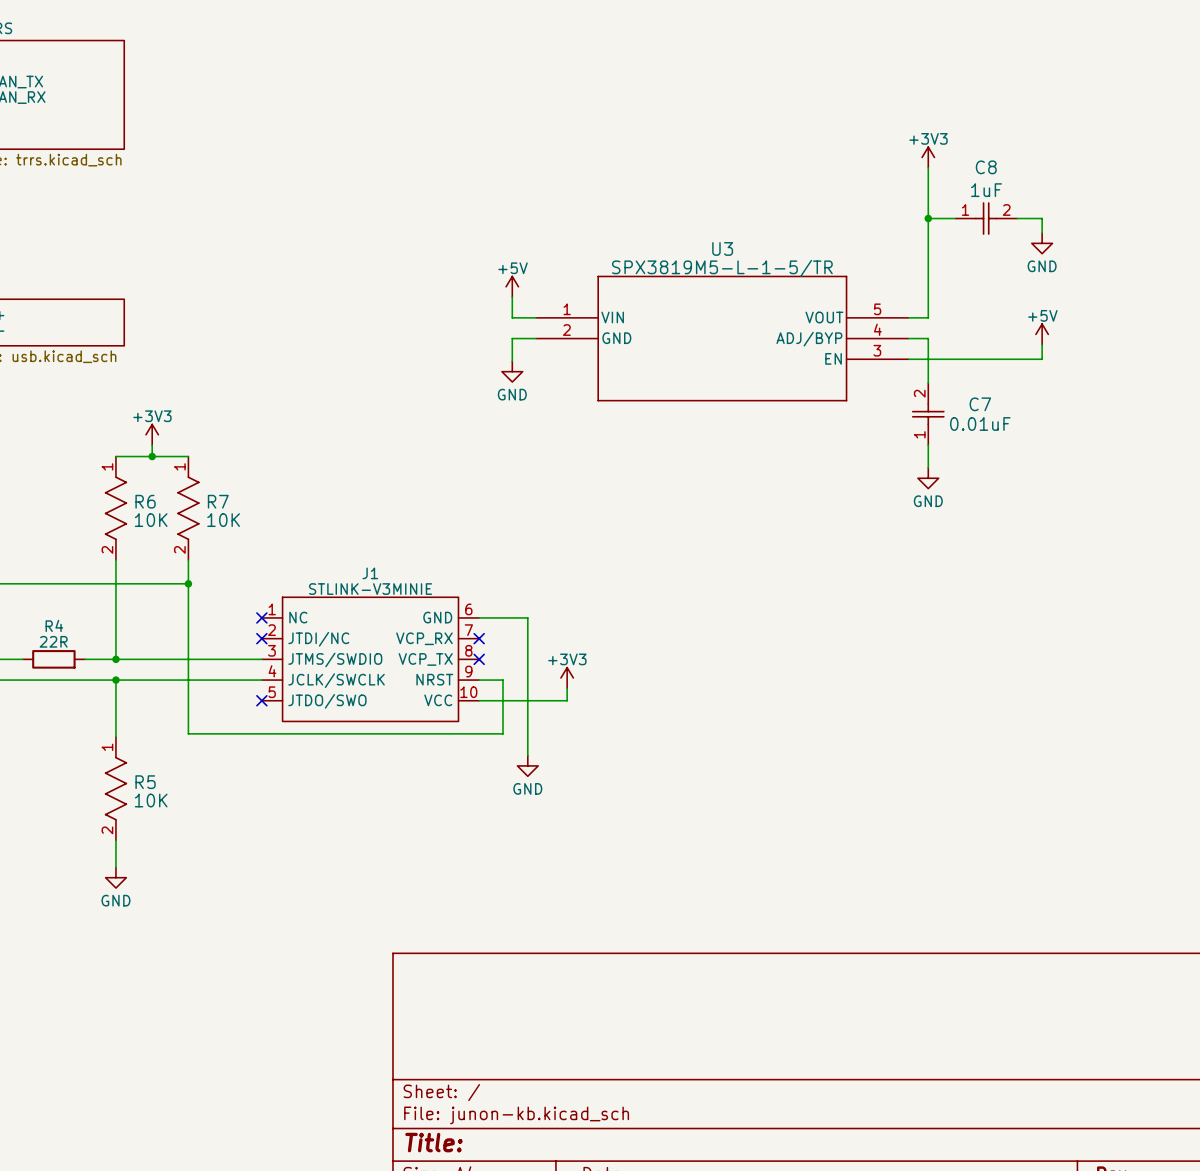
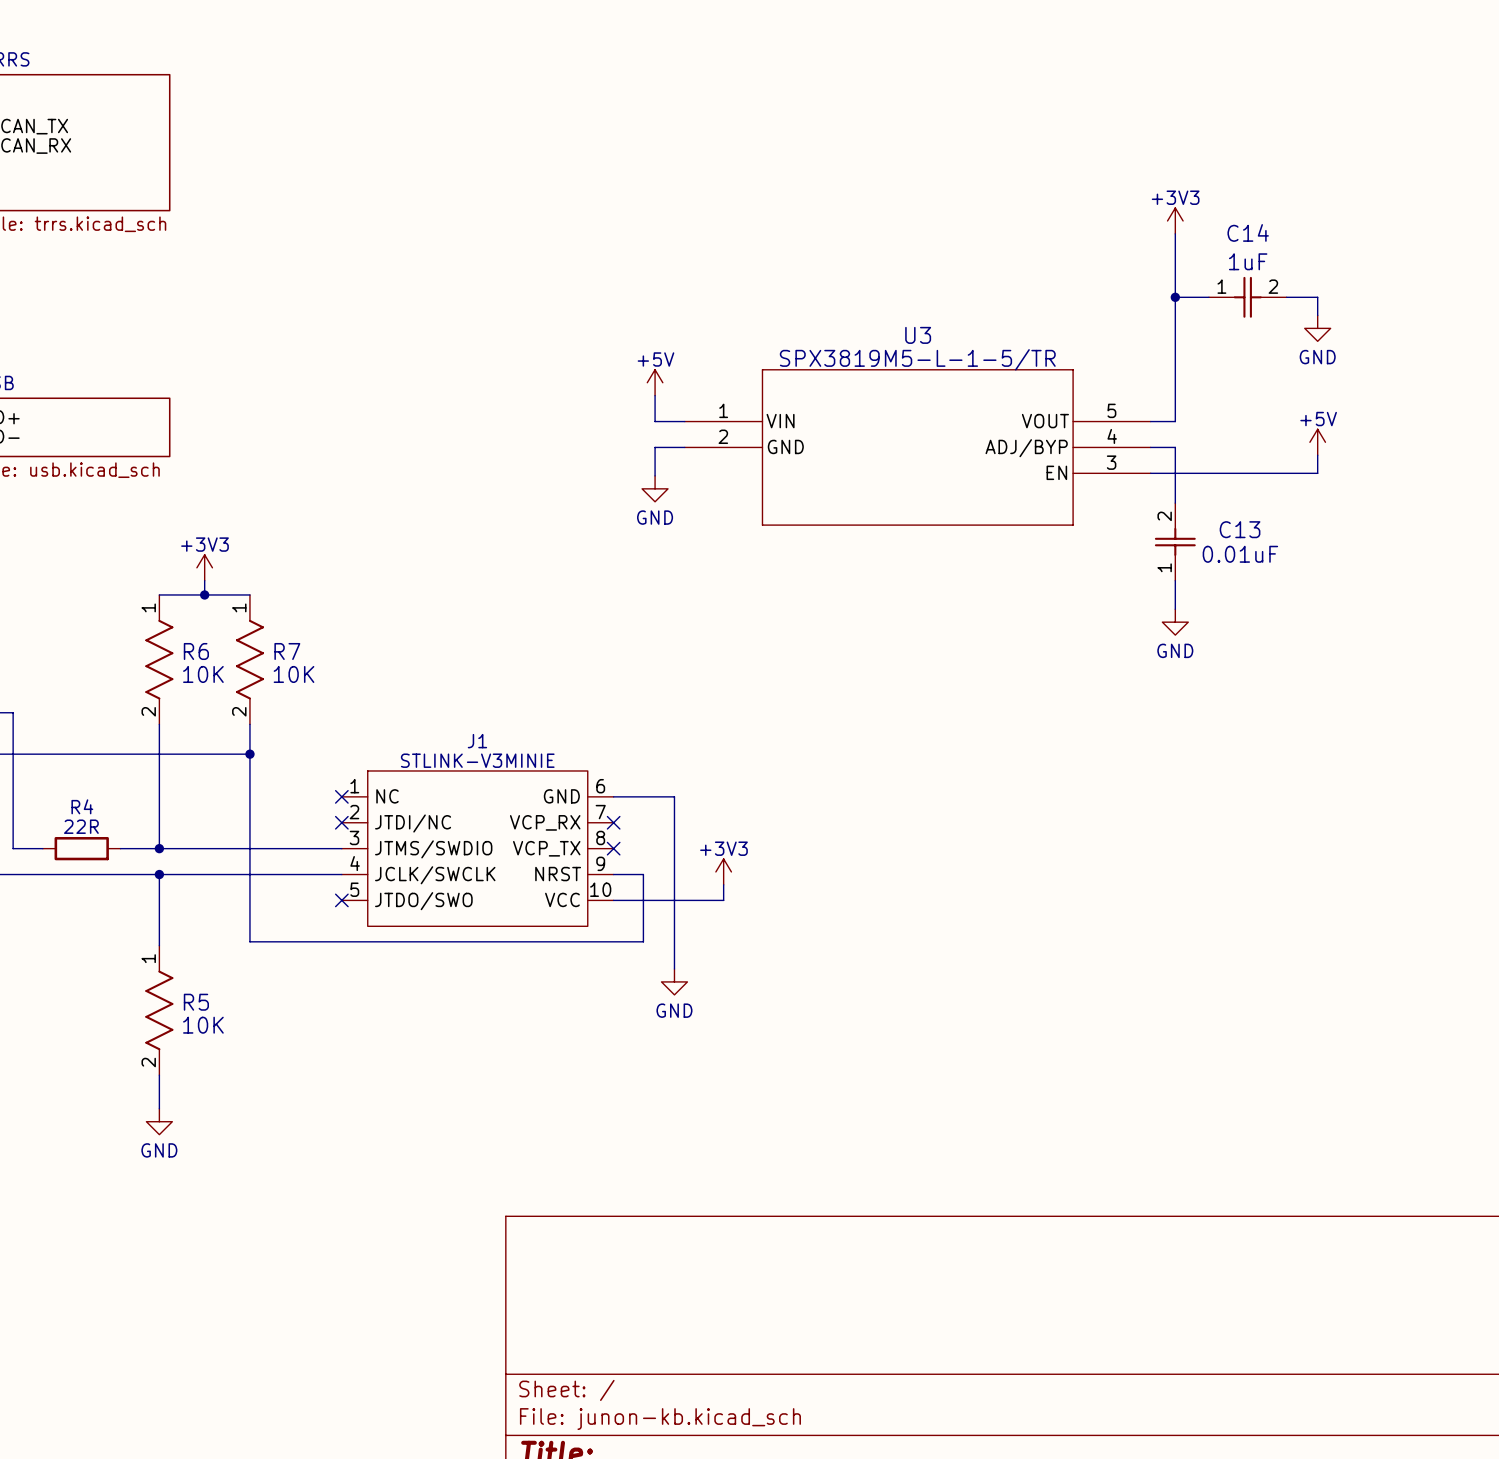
C8 name: C8 (986, 167) -> C14 (1248, 232)
C7 name: C7 (980, 404) -> C13 (1240, 529)

